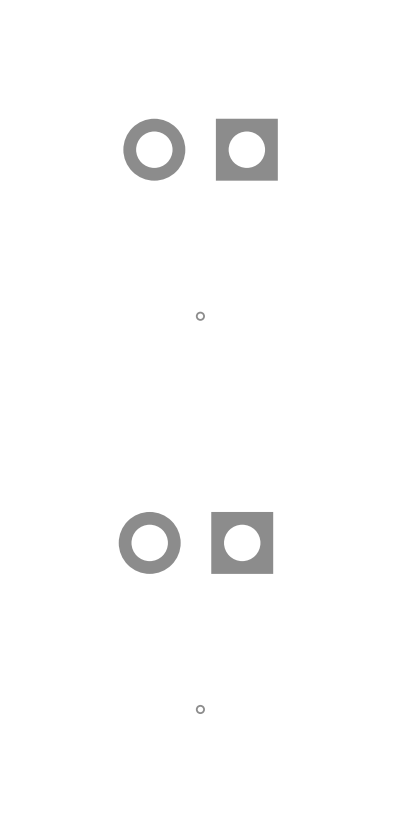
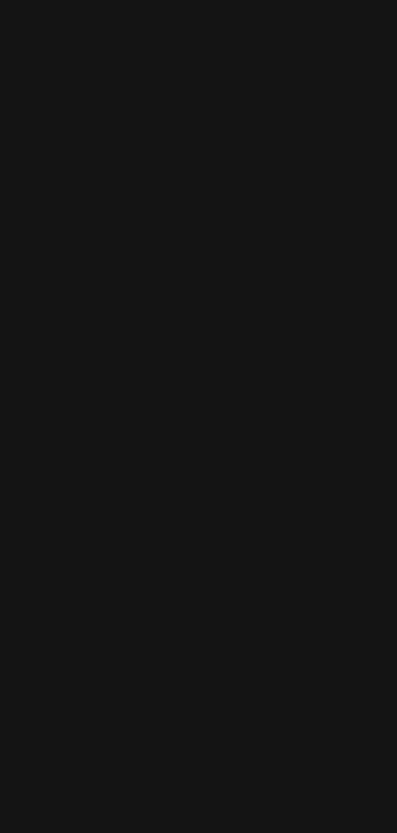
part: (200, 149) -> none
via: (200, 316) -> none
part: (195, 542) -> none
via: (200, 709) -> none

